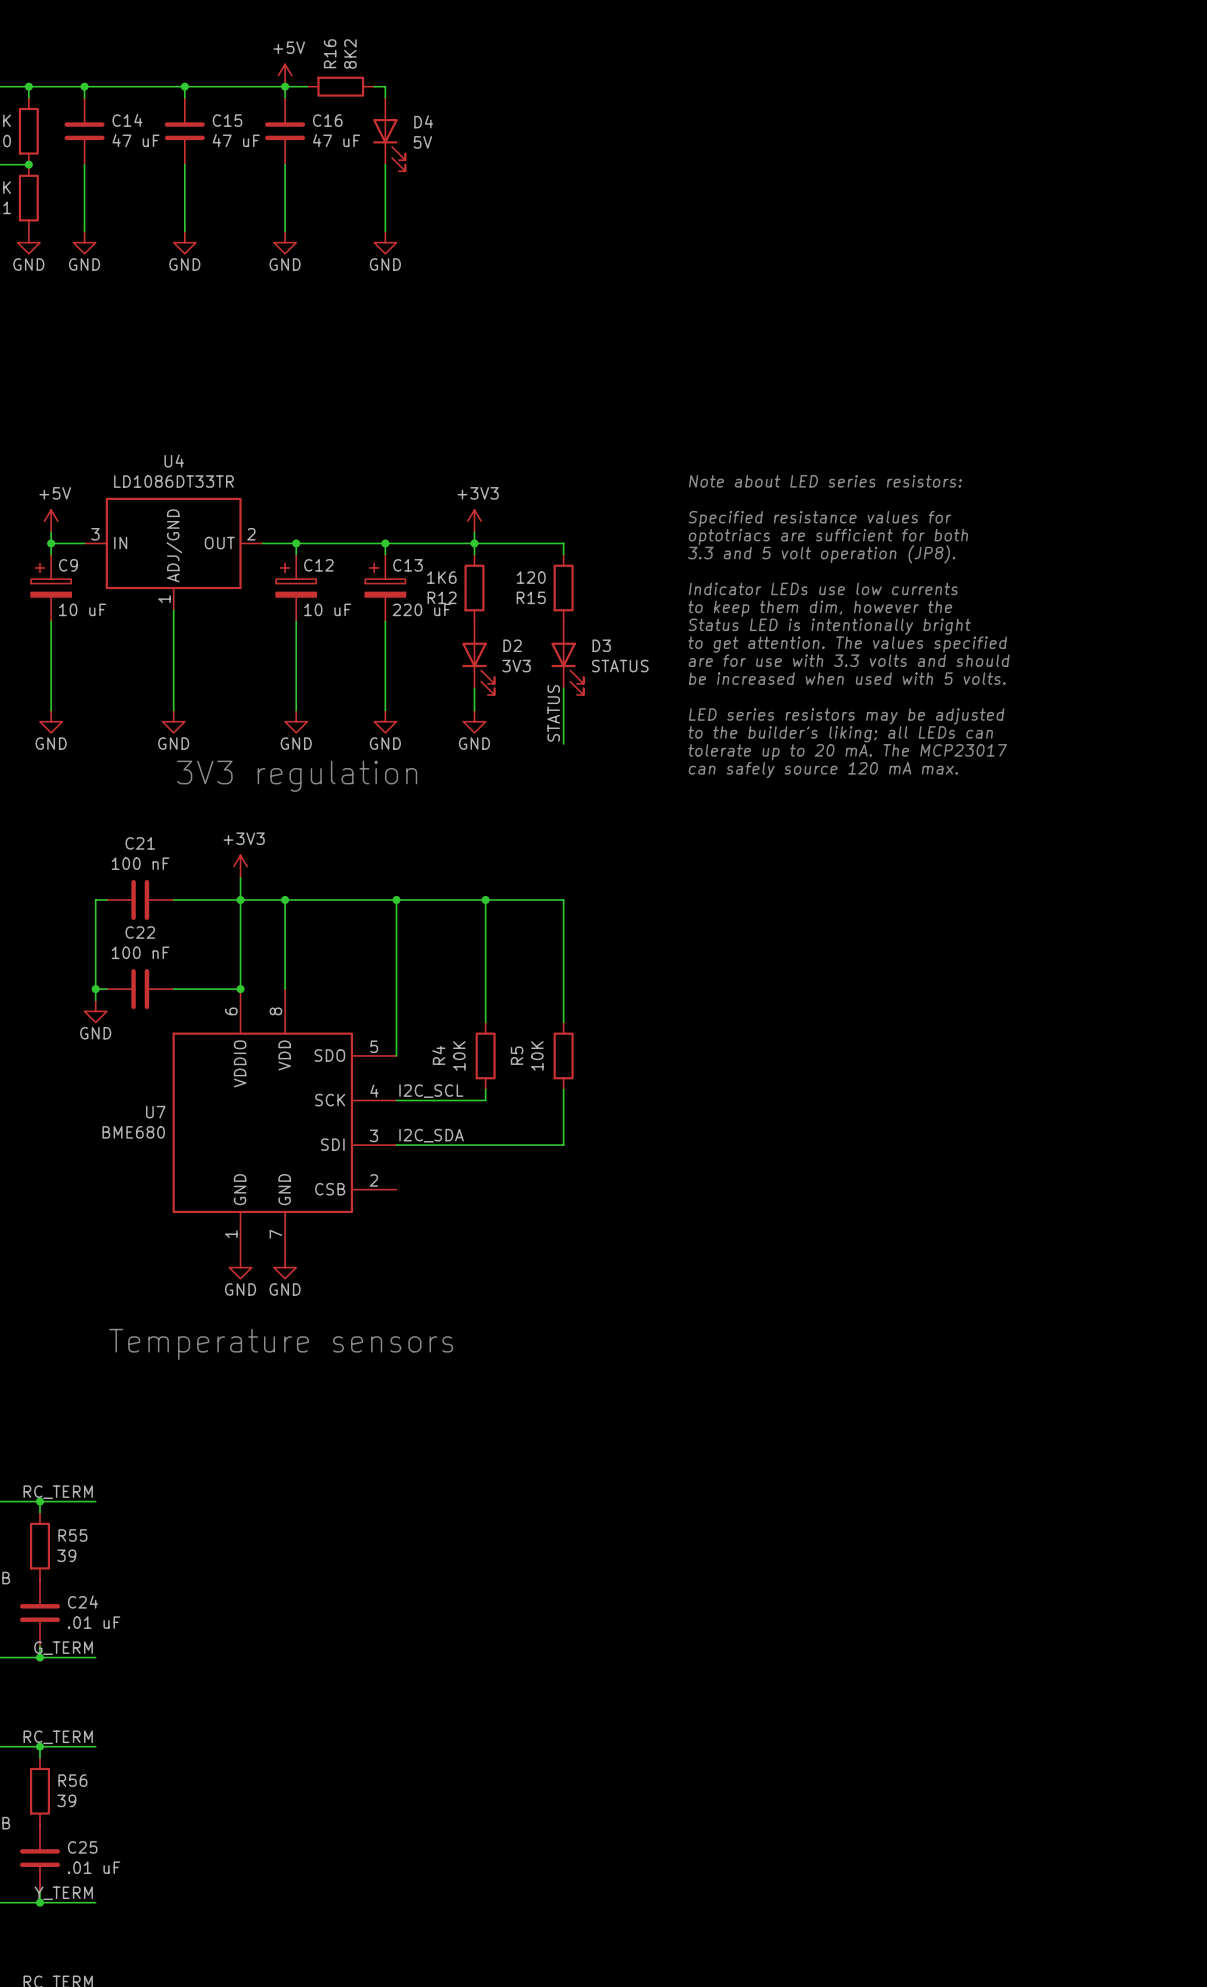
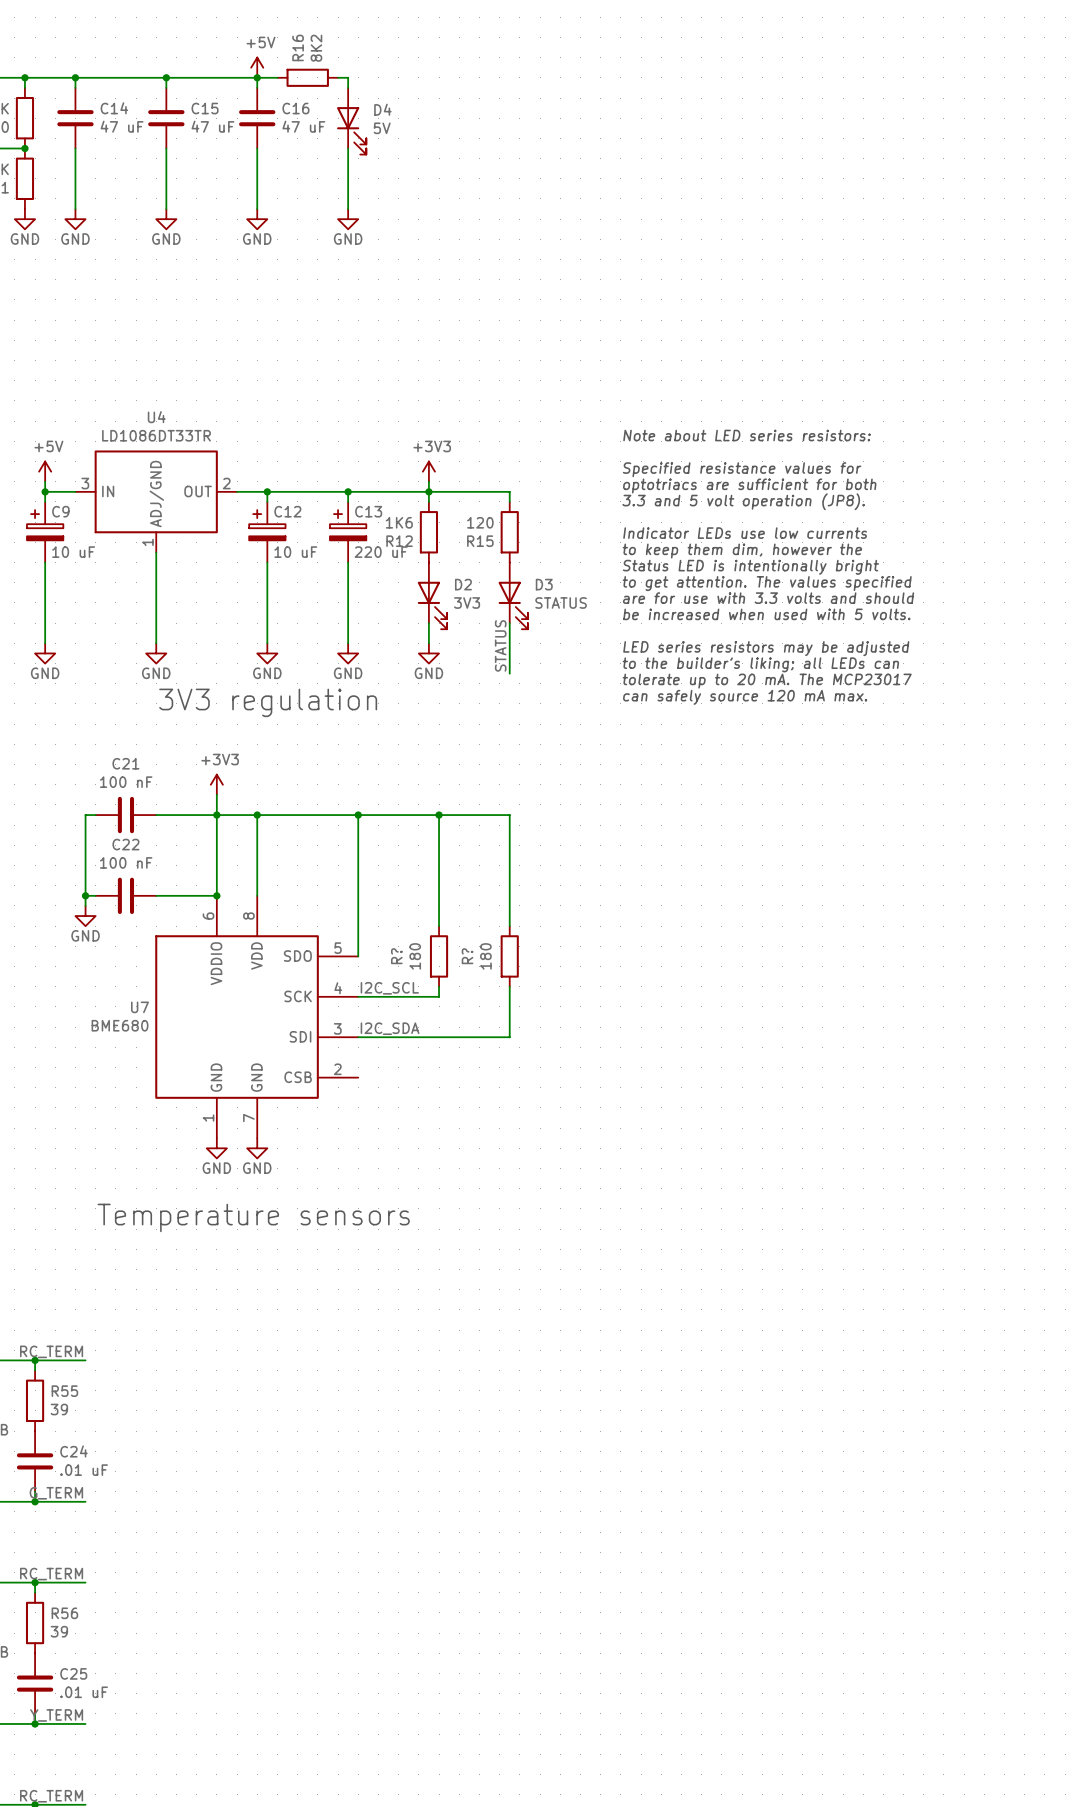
R4 name: R4 (438, 1055) -> R? (396, 956)
R4 value: 10K (459, 1055) -> 180 (415, 956)
R5 name: R5 (517, 1055) -> R? (467, 956)
R5 value: 10K (537, 1055) -> 180 (485, 956)

